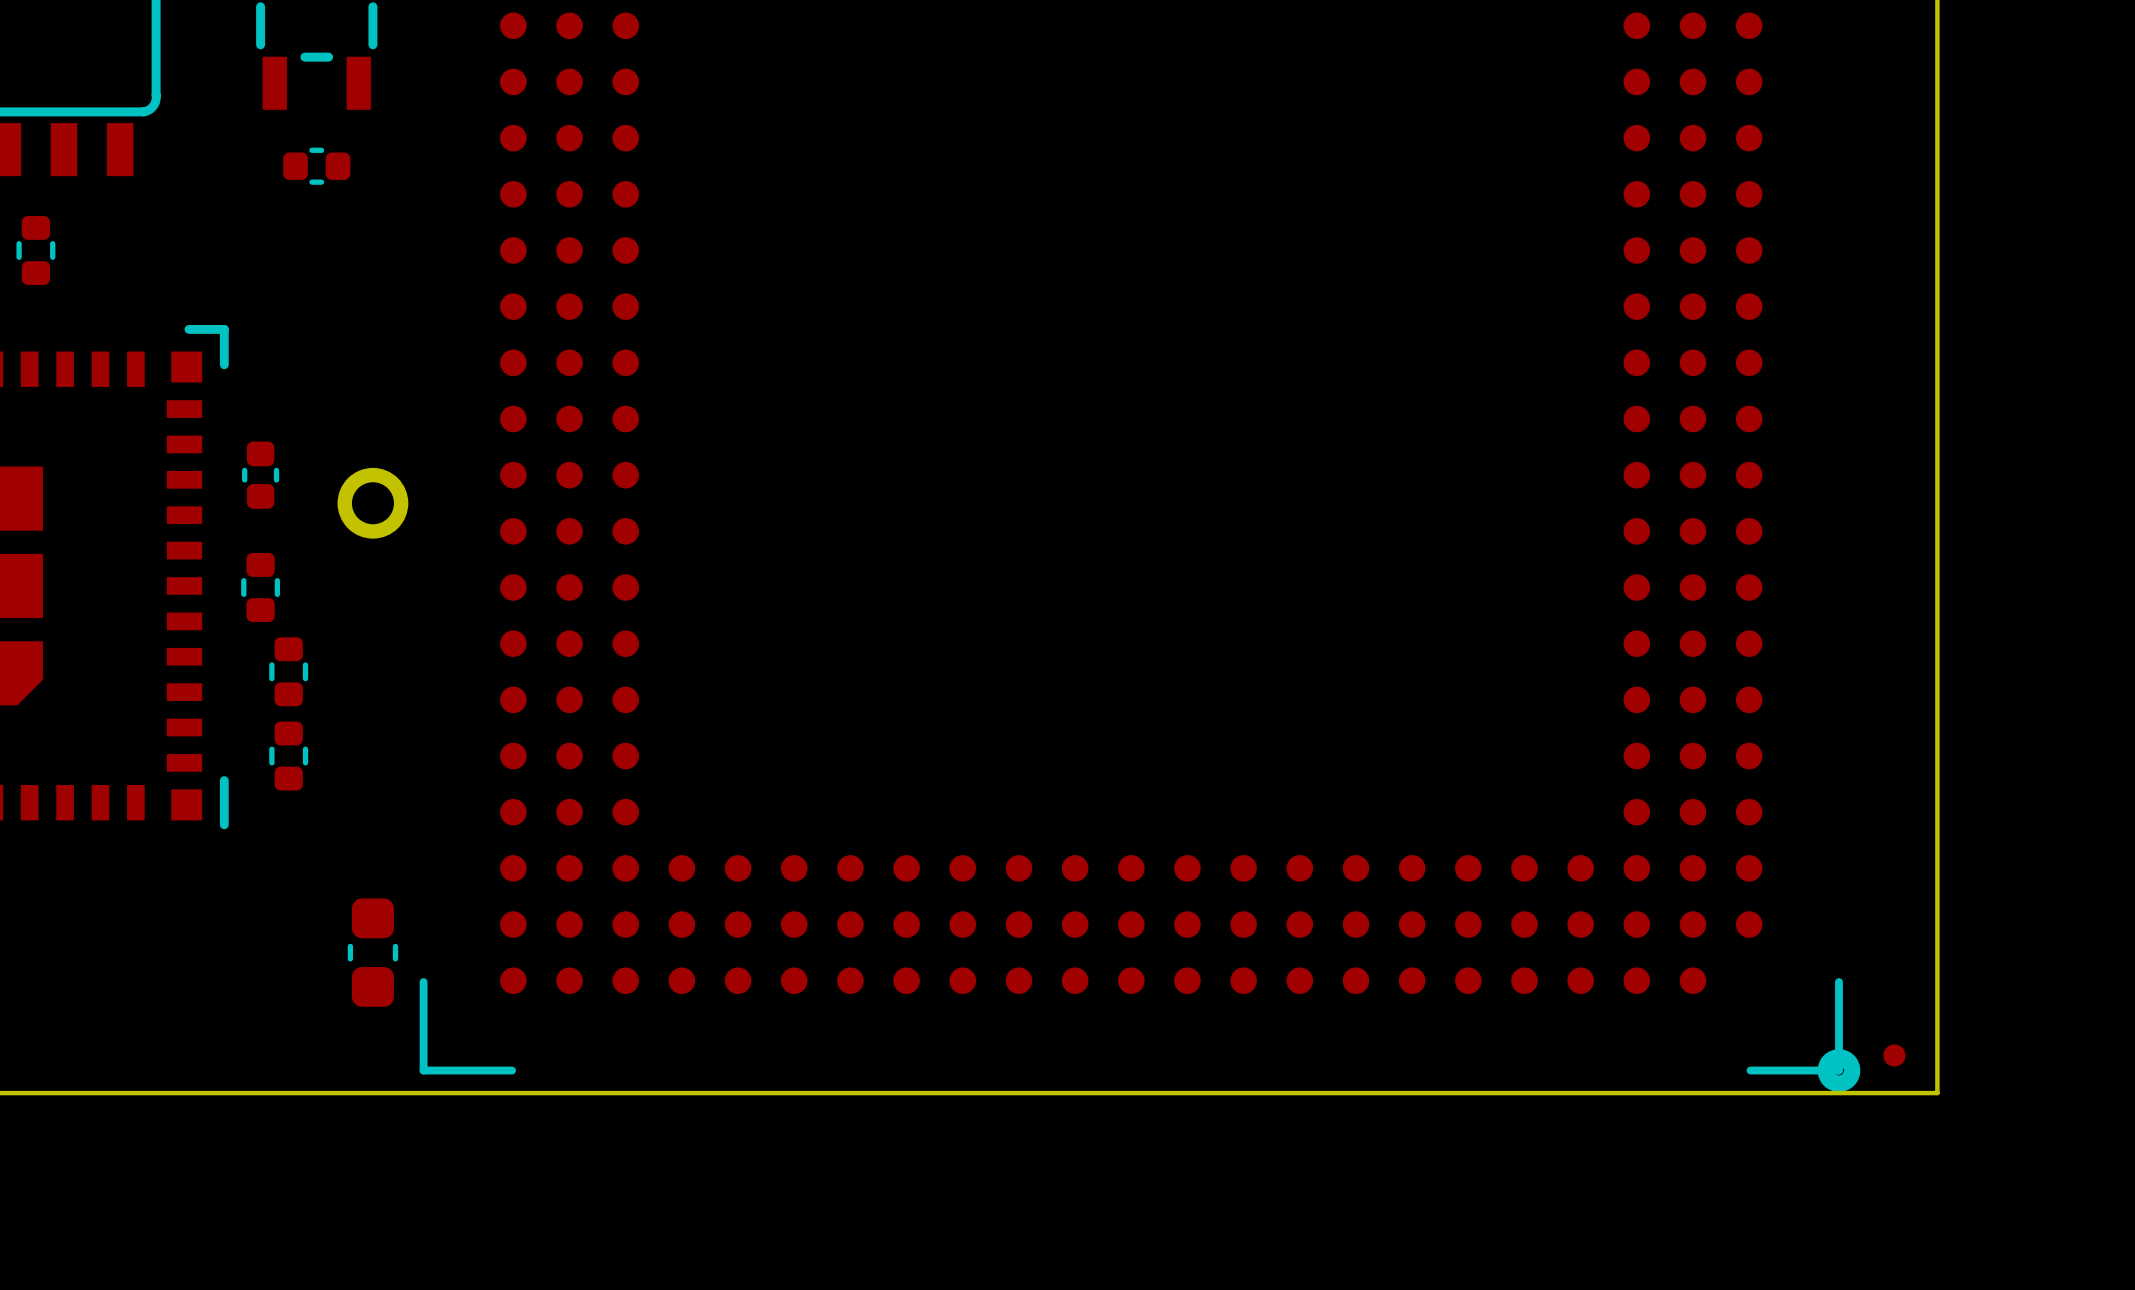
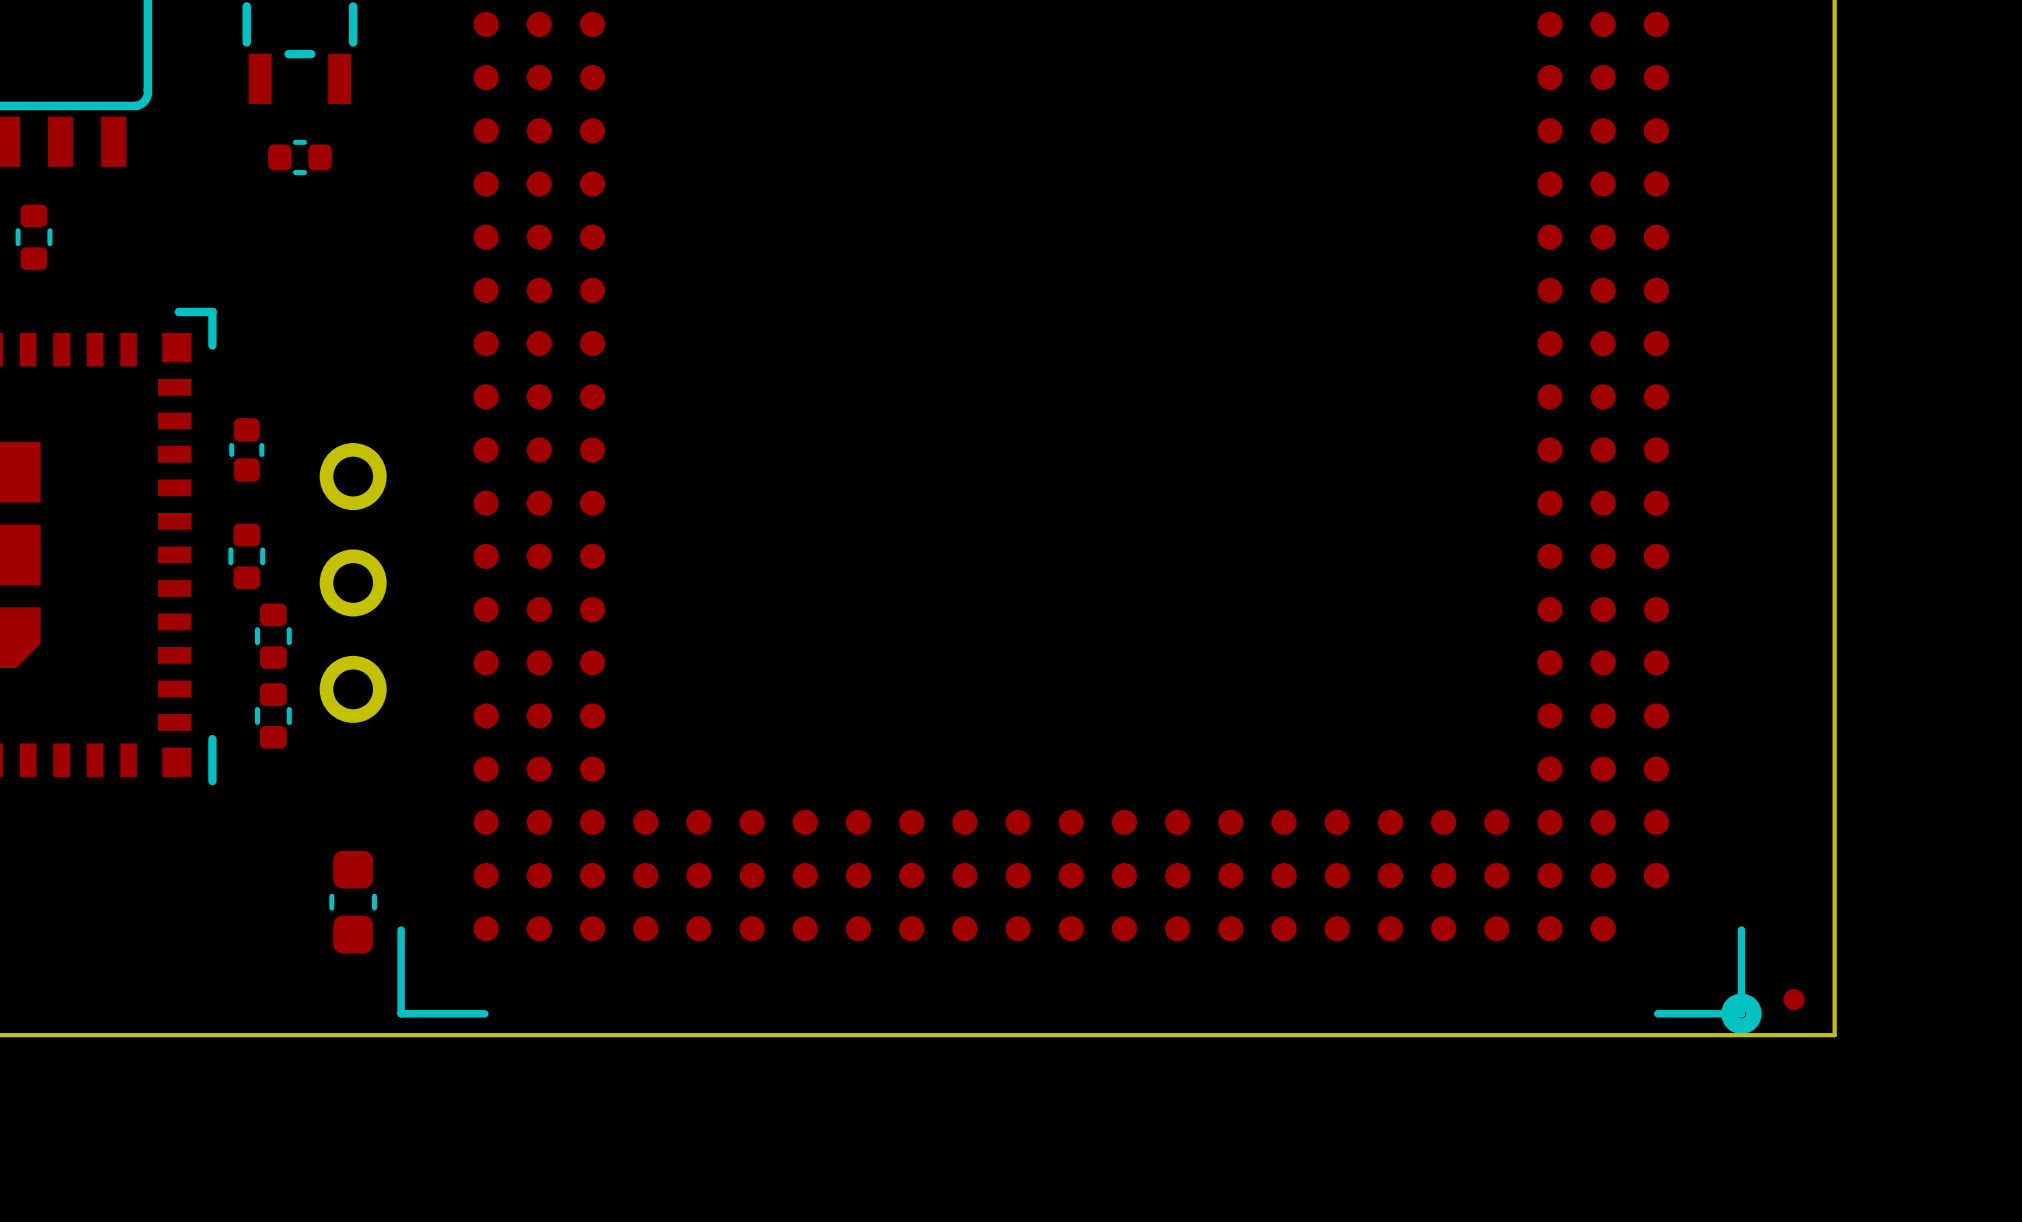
part: none -> (353, 582)
part: none -> (353, 689)

